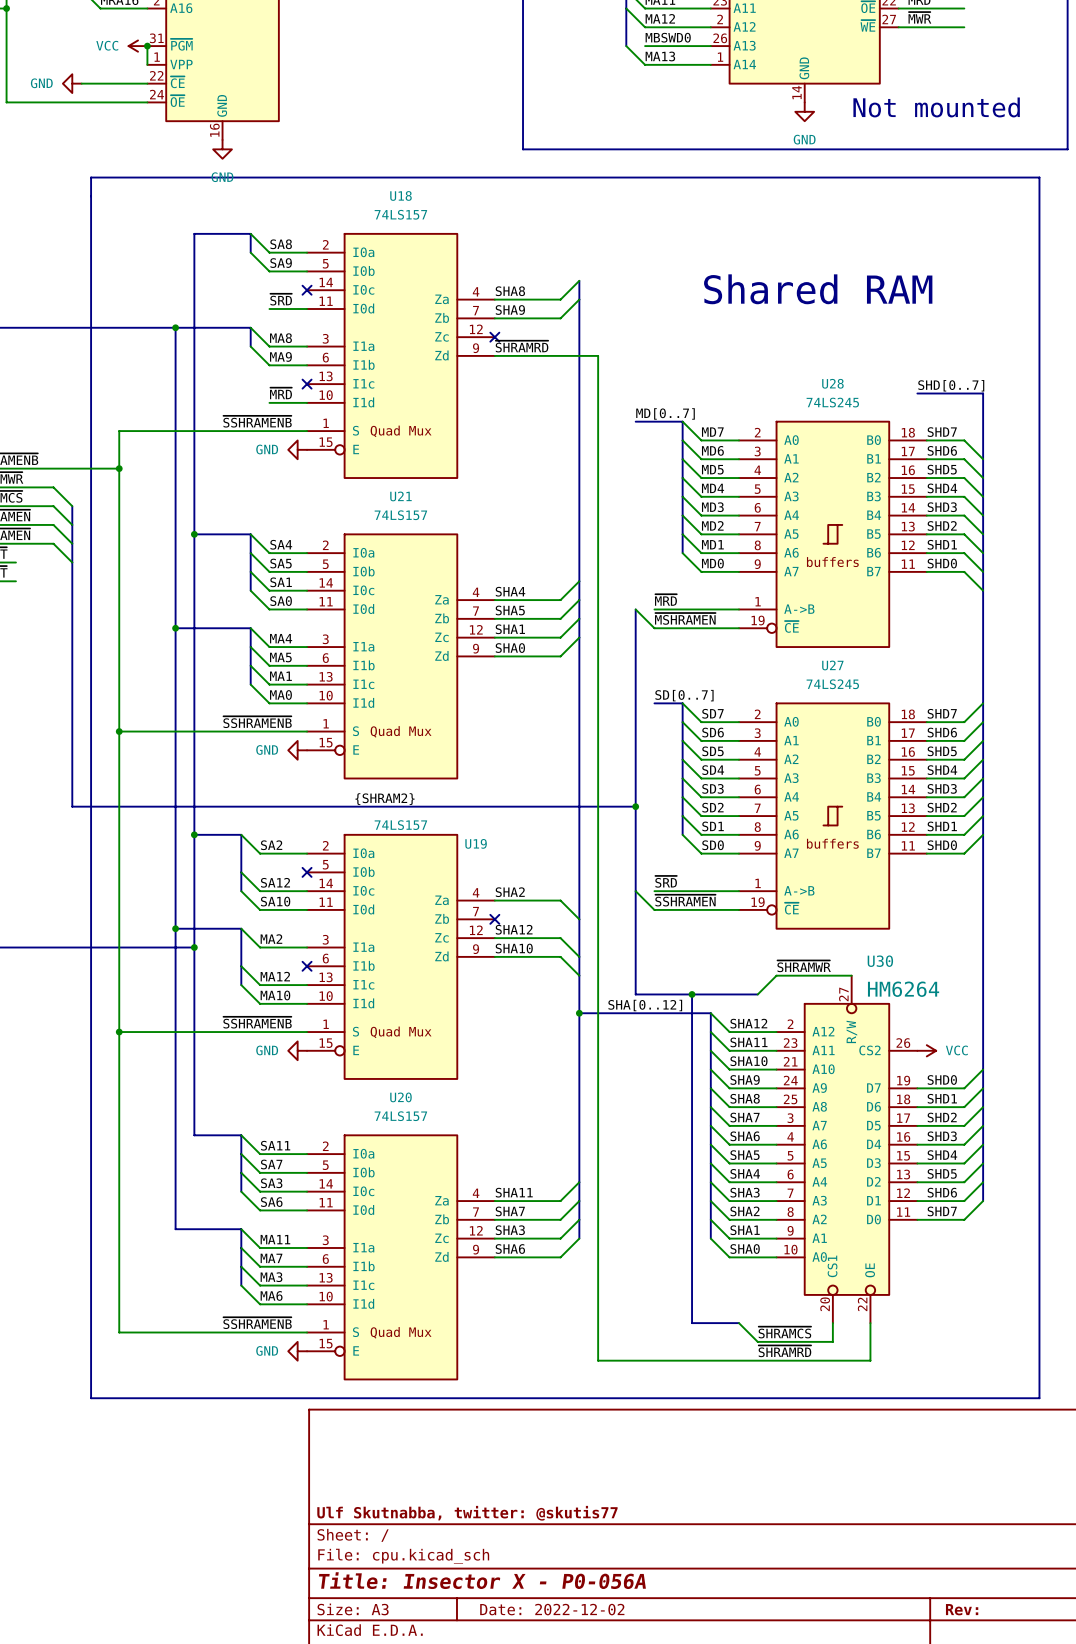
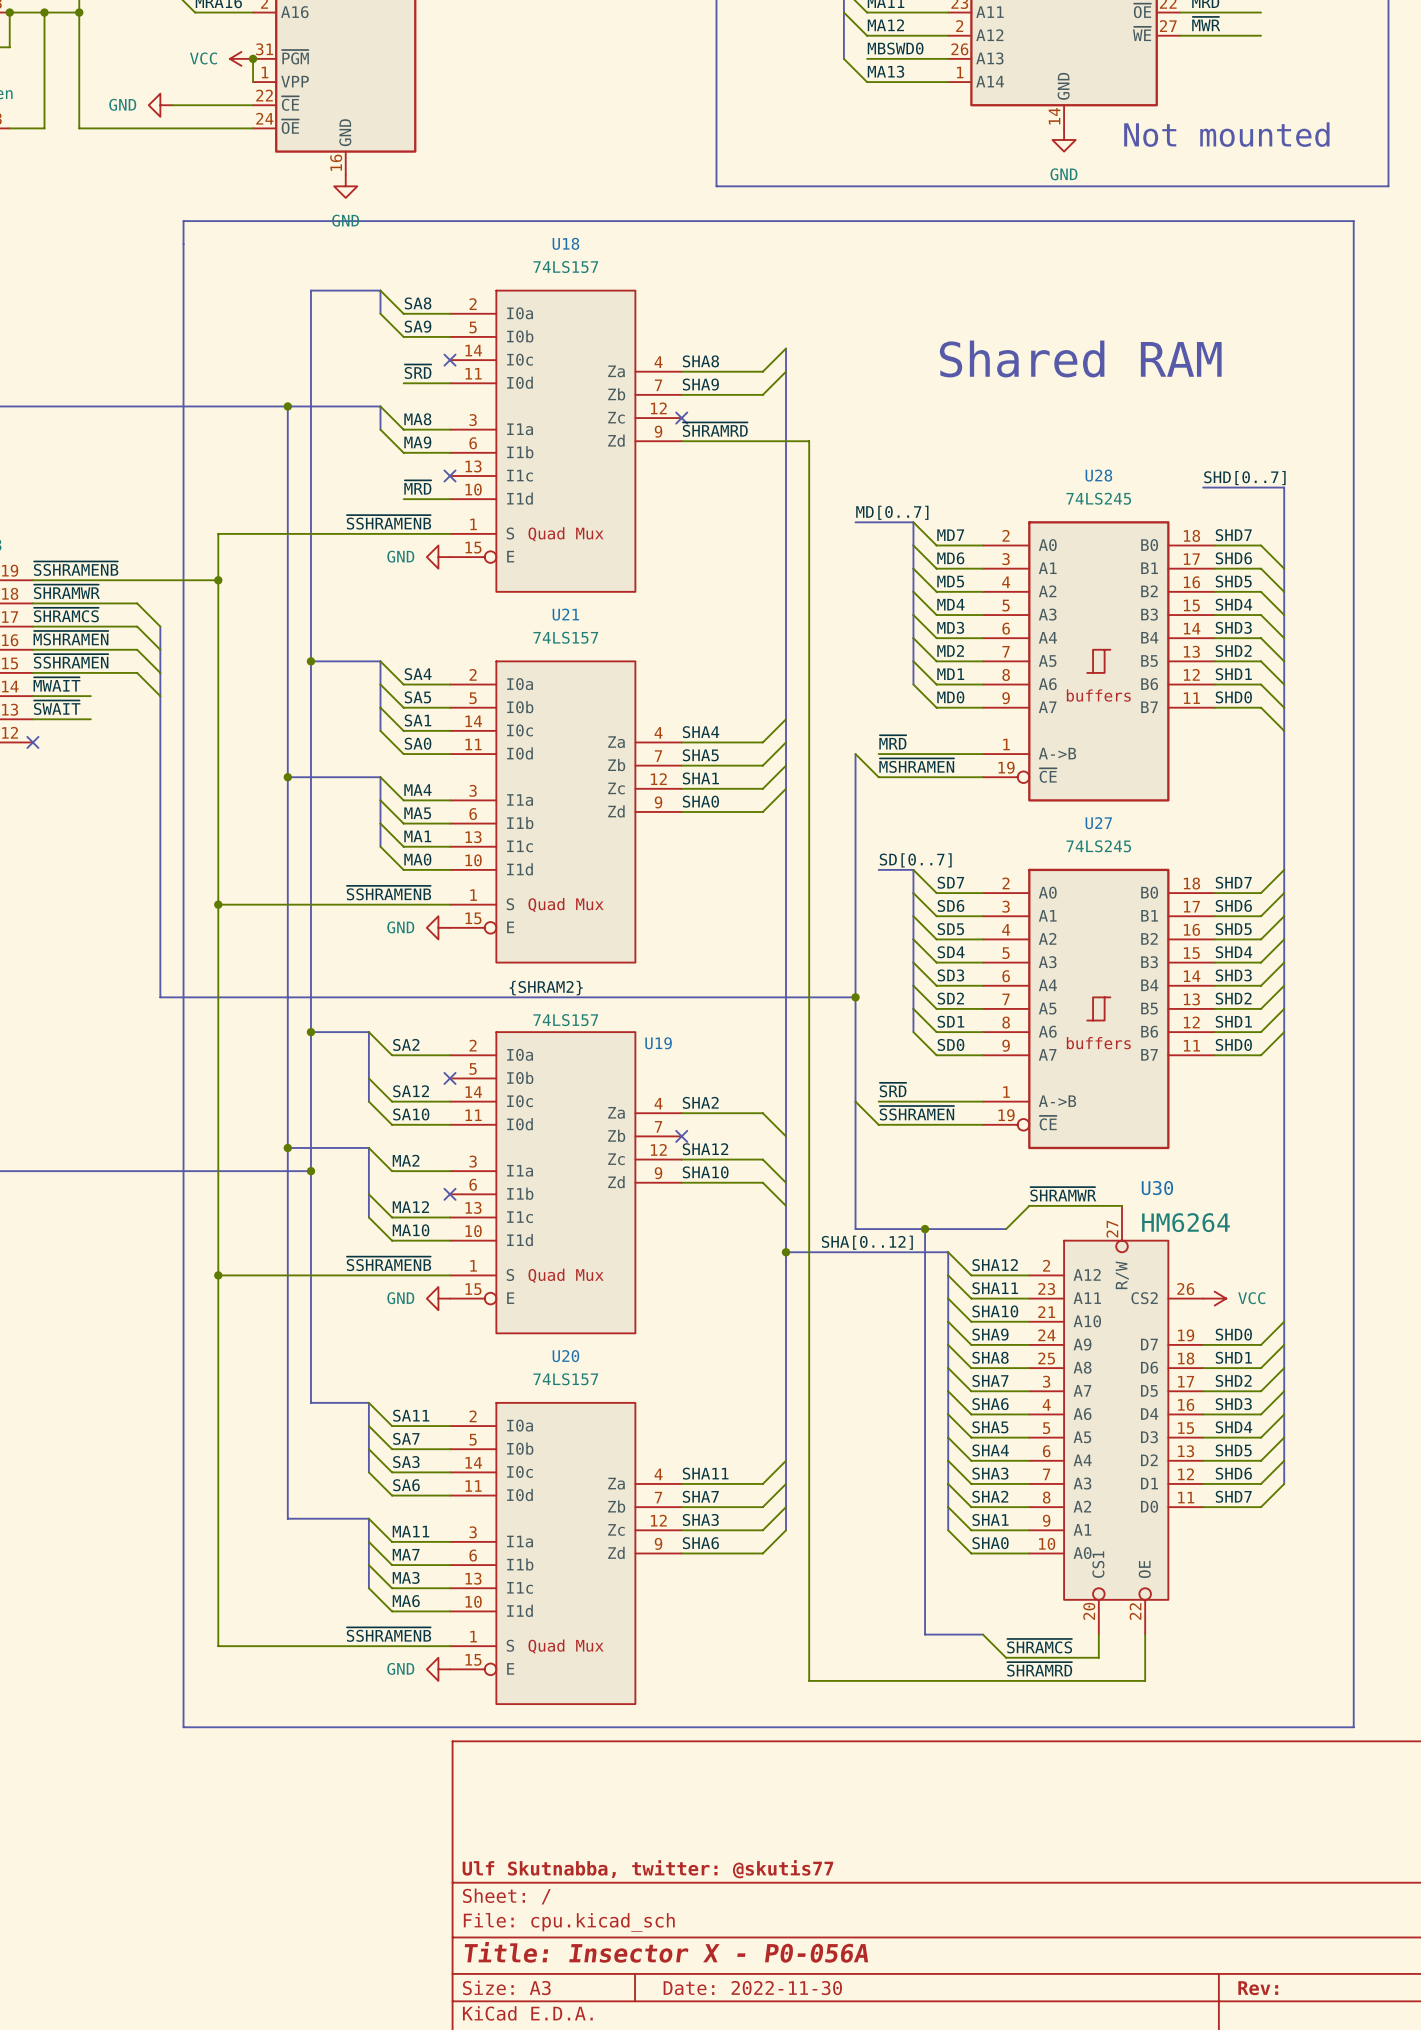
title block: Date: 2022-12-02 (552, 1609) -> Date: 2022-11-30 (752, 1988)

